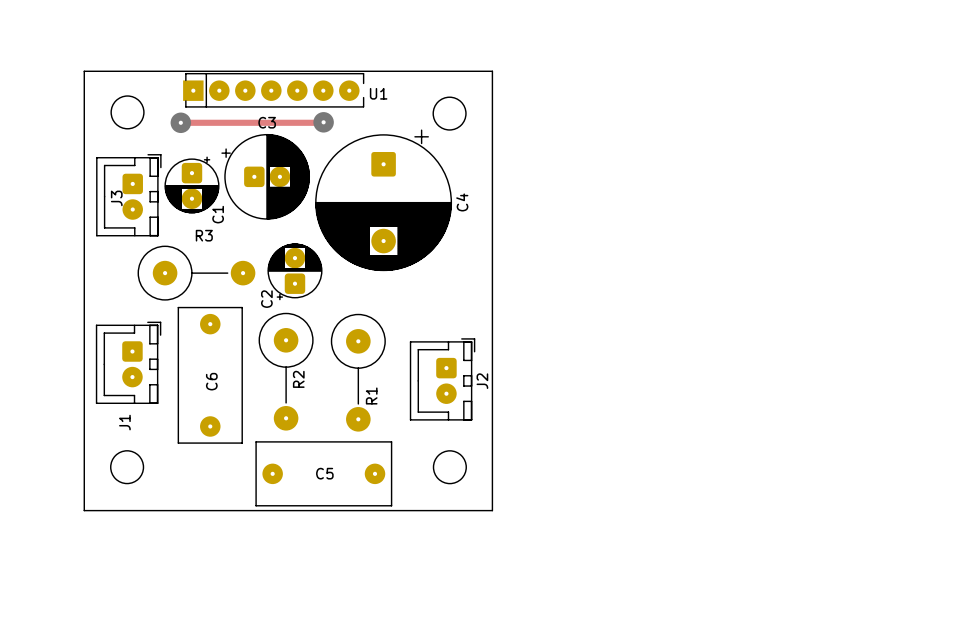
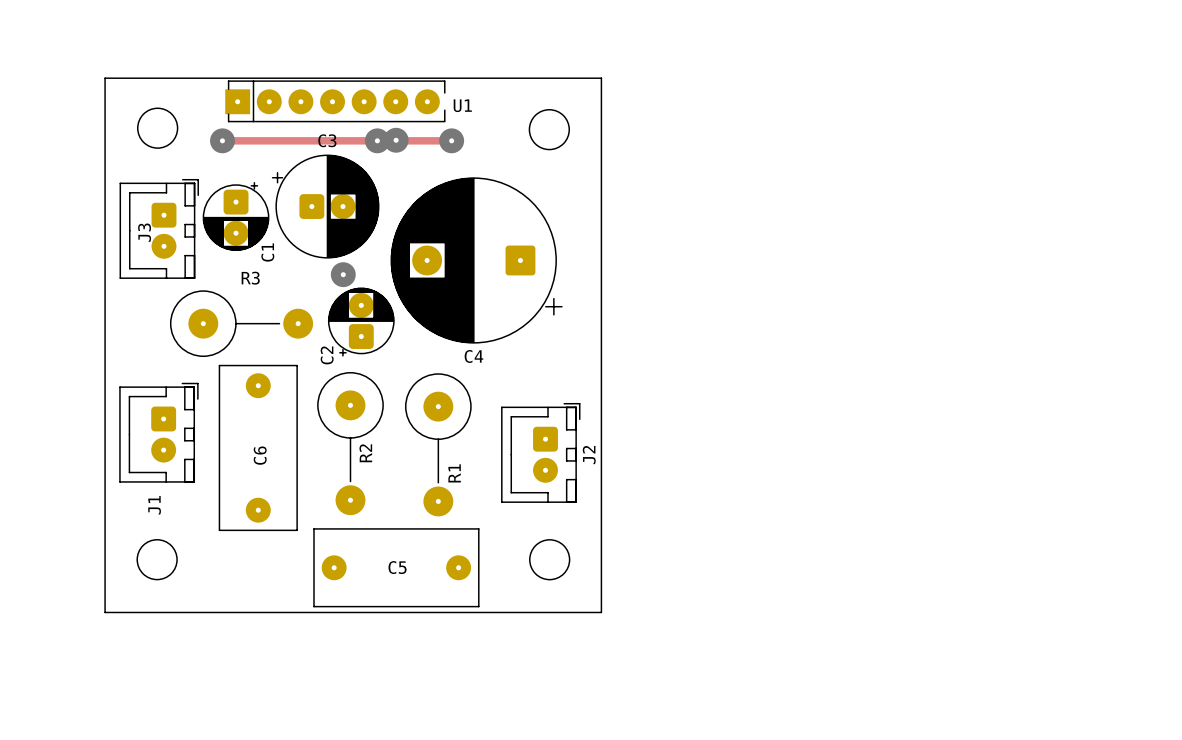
via: none -> (377, 140)
track: none -> (402, 140) (451, 140)
via: none -> (451, 140)
C4 rotation: 0° (383, 200) -> 90° clockwise (476, 260)
via: none -> (343, 274)

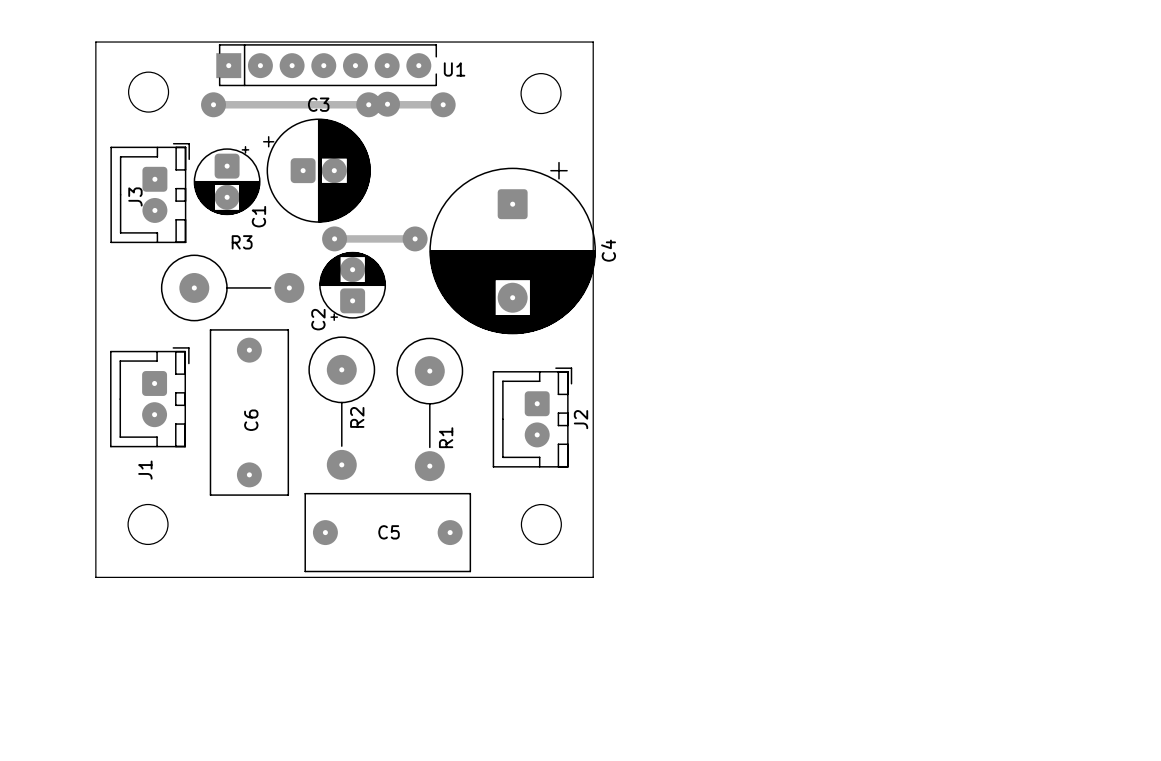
C4 rotation: 0° (476, 260) -> 90° counterclockwise (512, 248)
track: none -> (334, 238) (415, 238)
via: none -> (415, 238)

